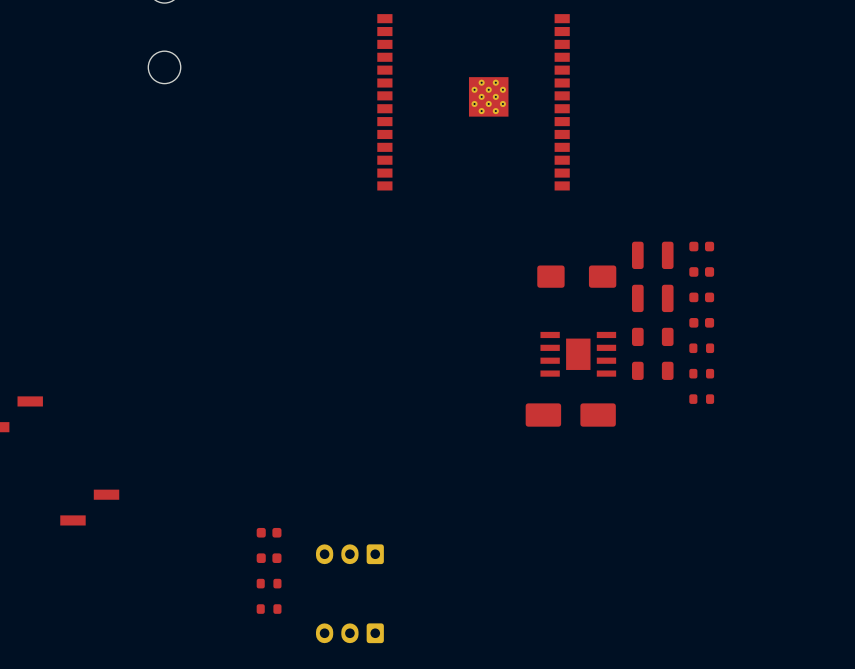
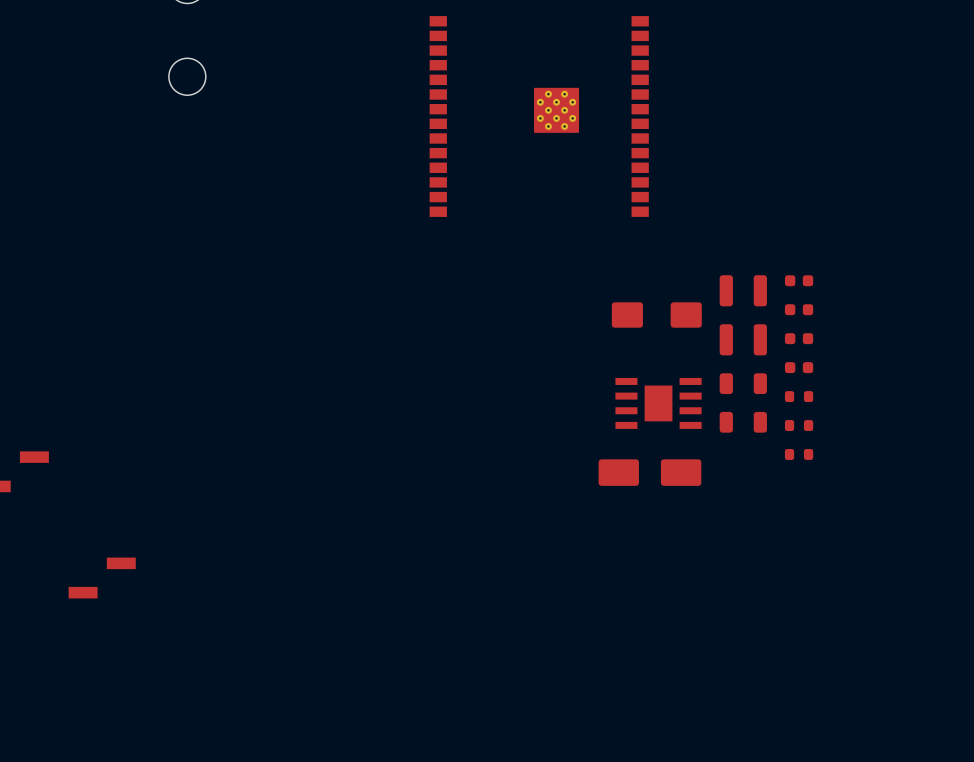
part: (269, 532) -> none
part: (349, 554) -> none
part: (269, 558) -> none
part: (269, 583) -> none
part: (269, 609) -> none
part: (349, 633) -> none

